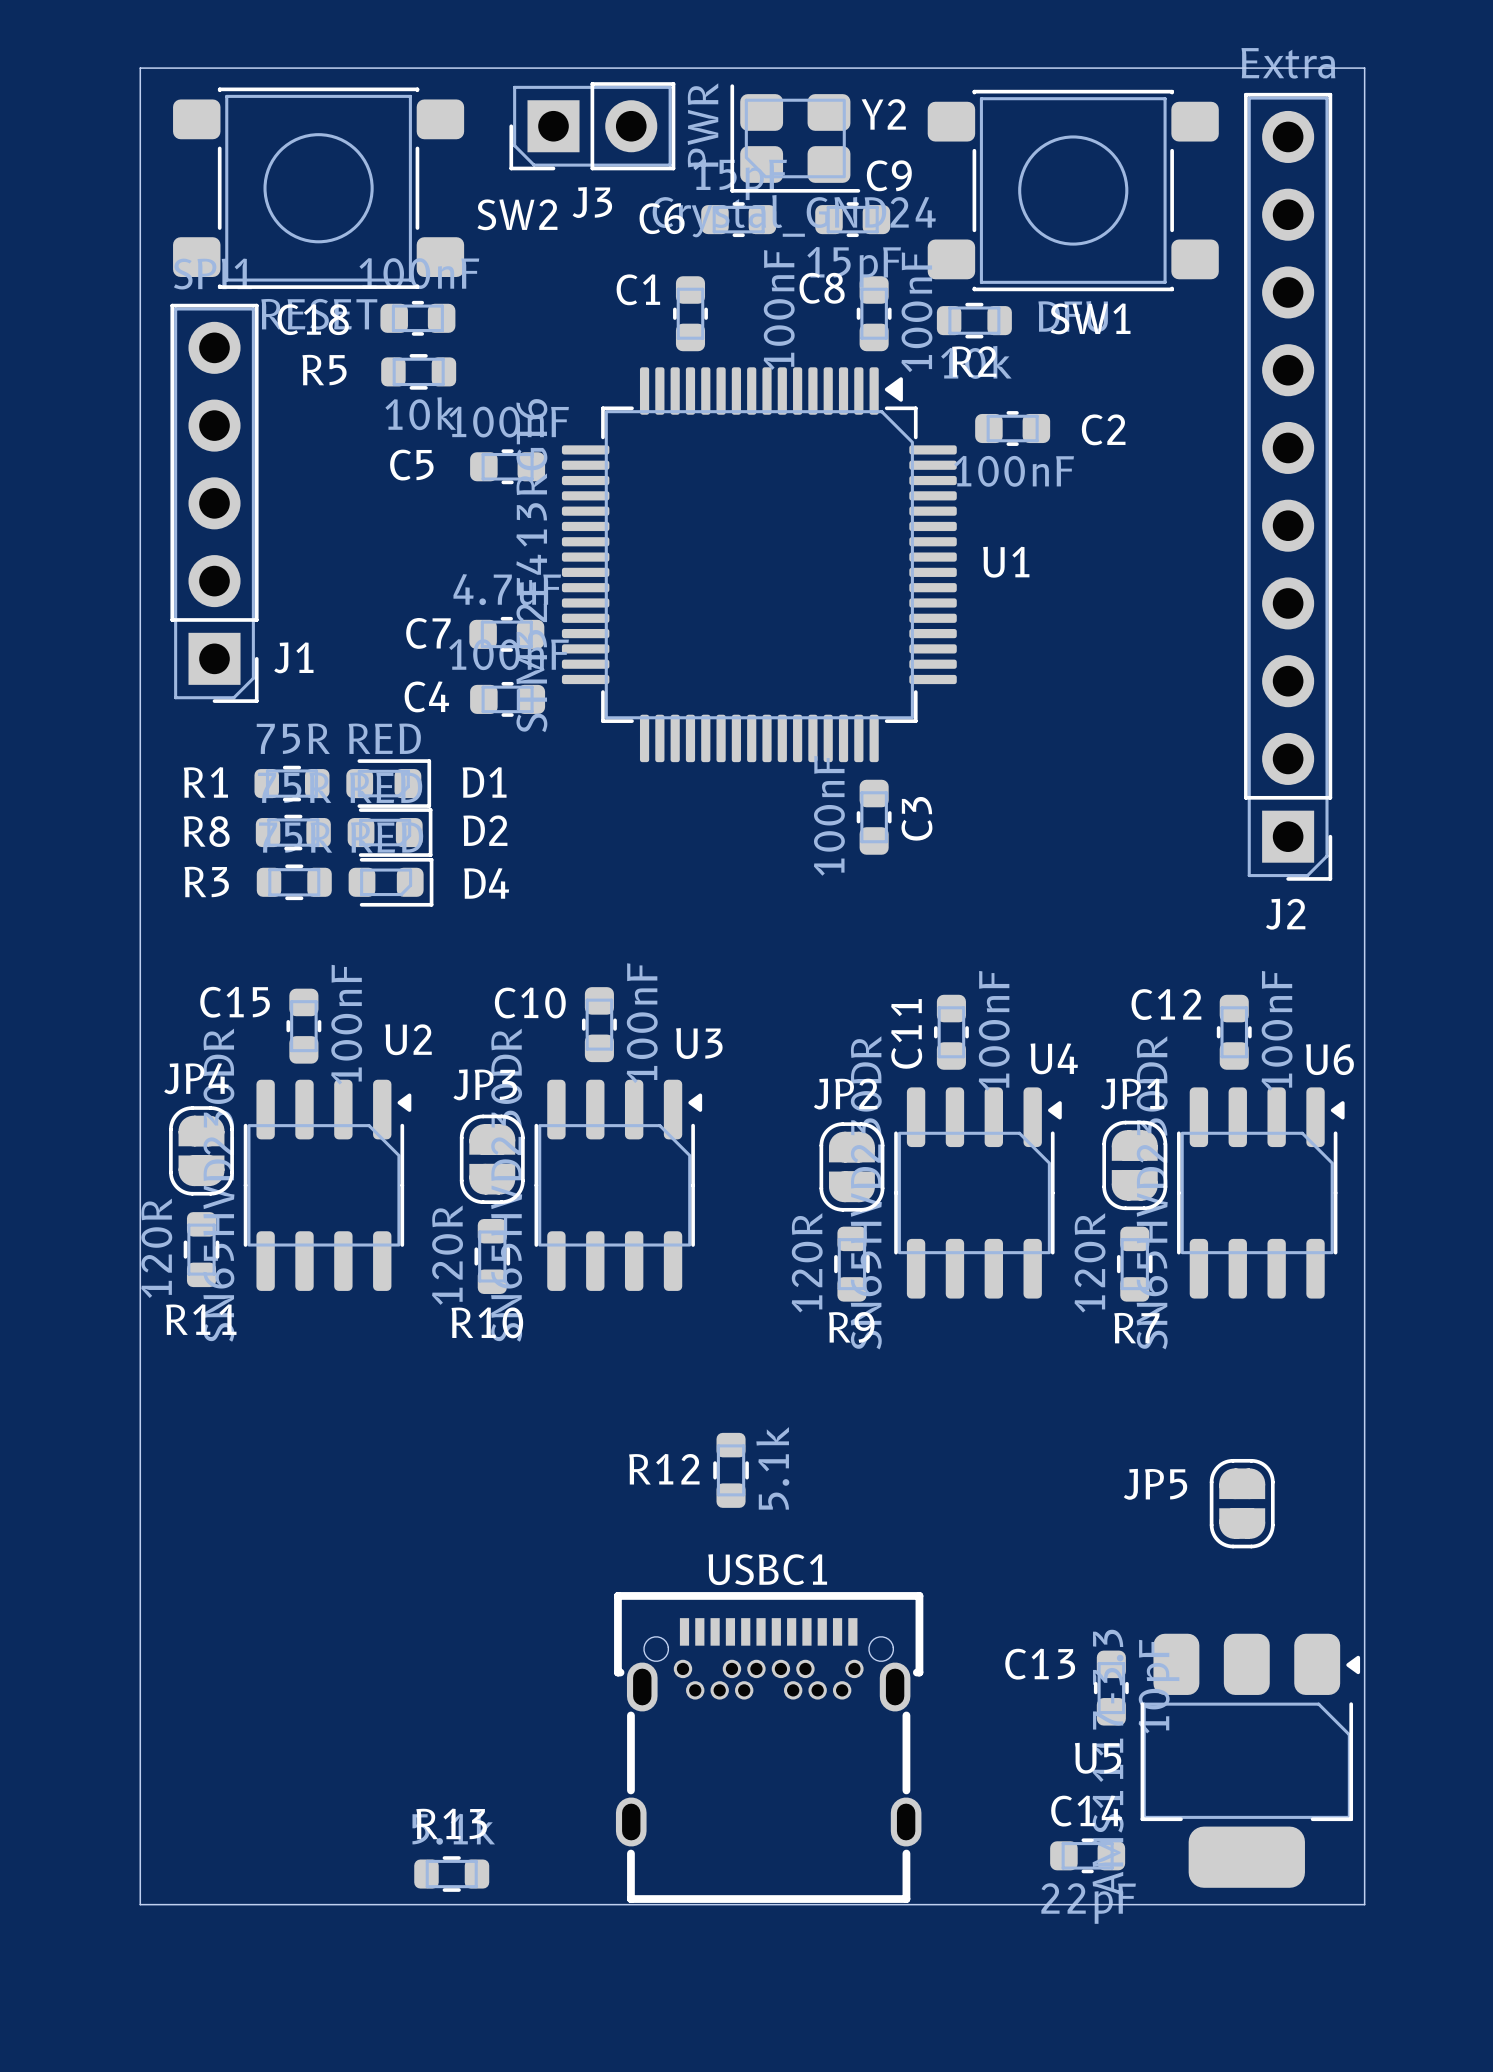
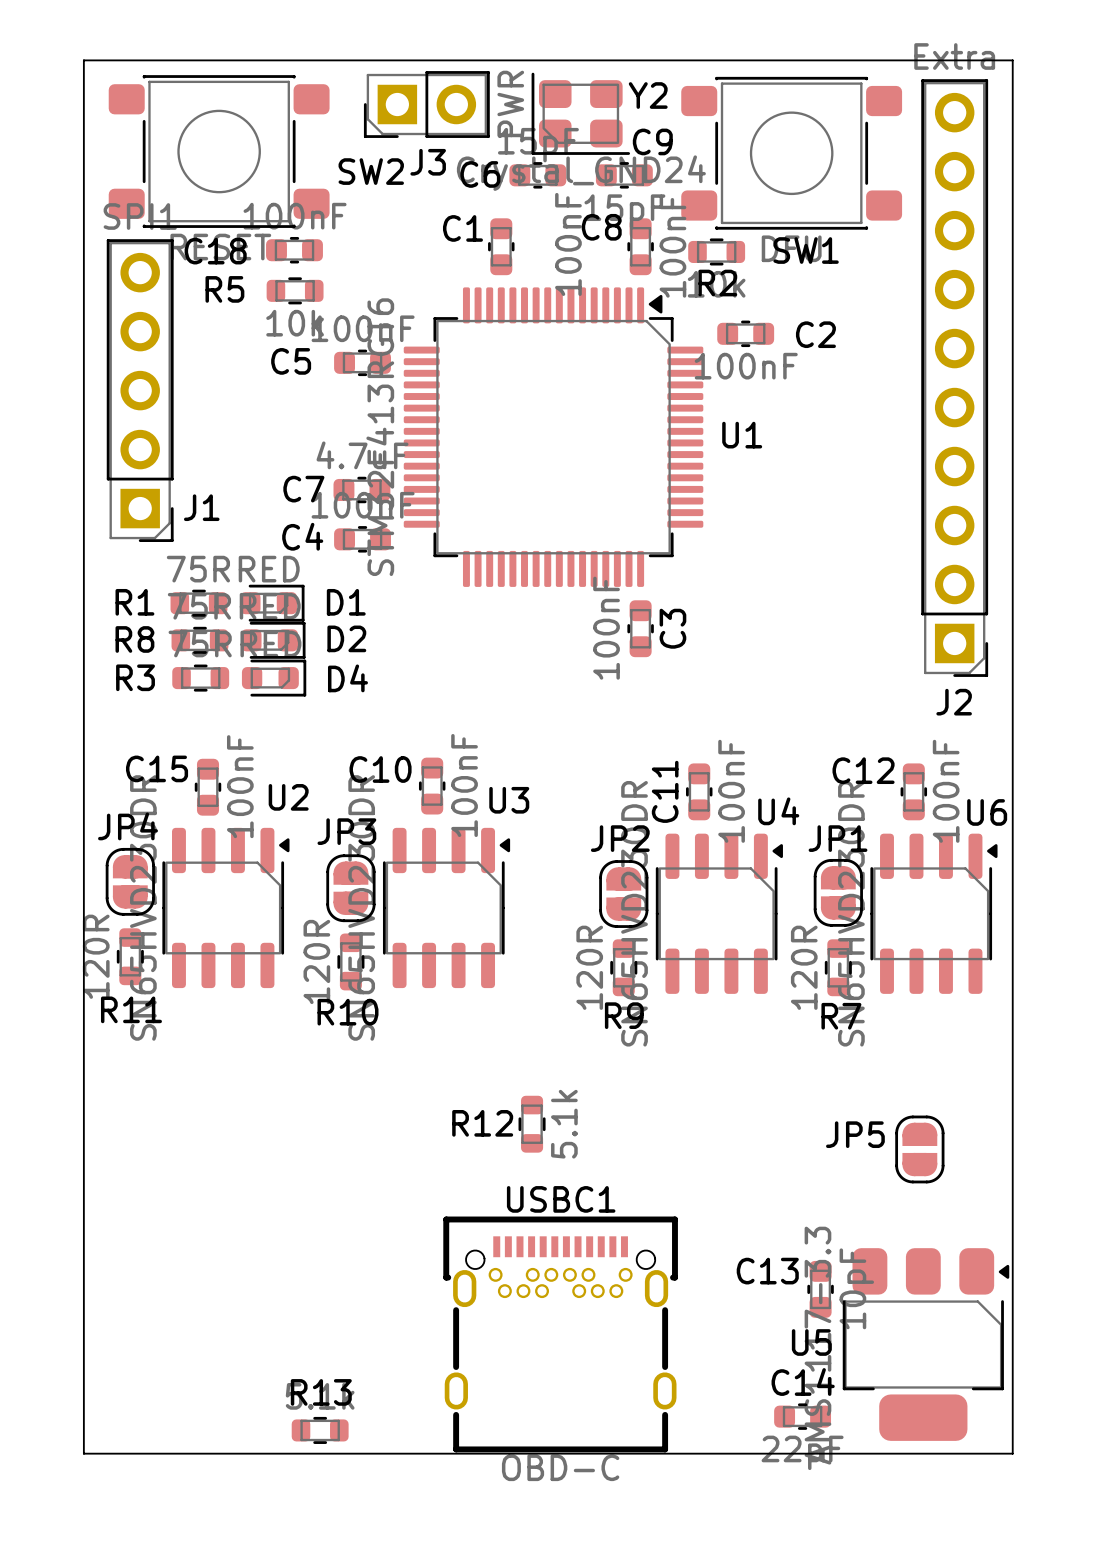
USBC1 value: none -> OBD-C (560, 1467)

